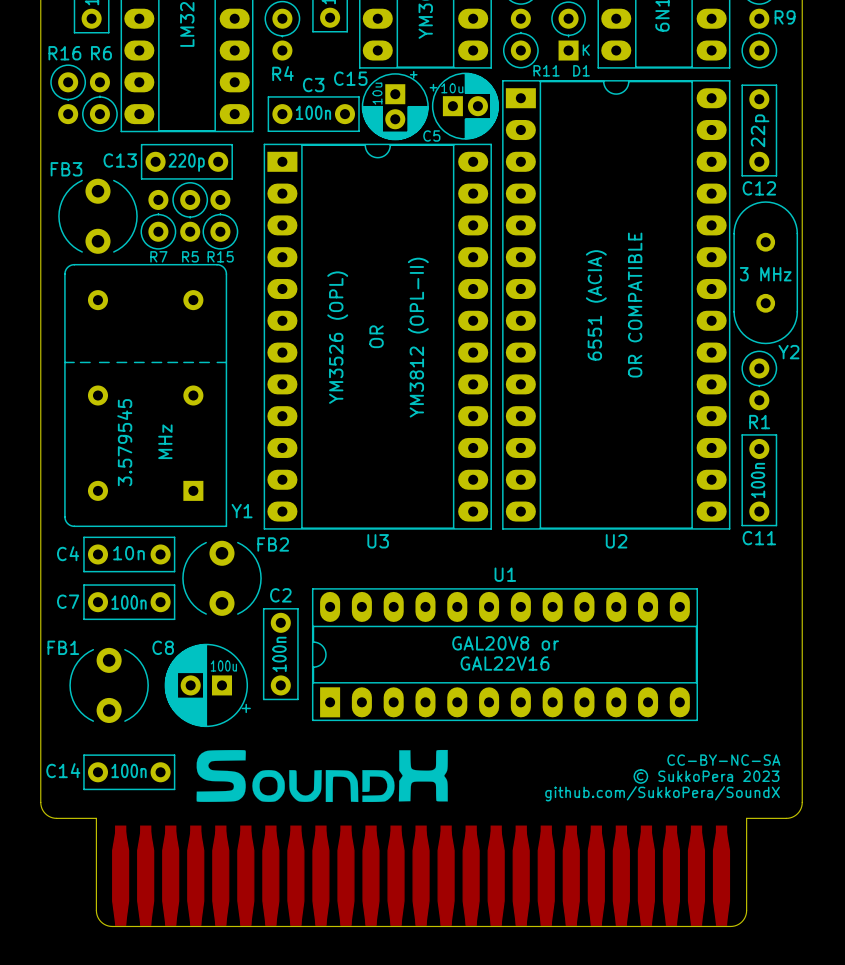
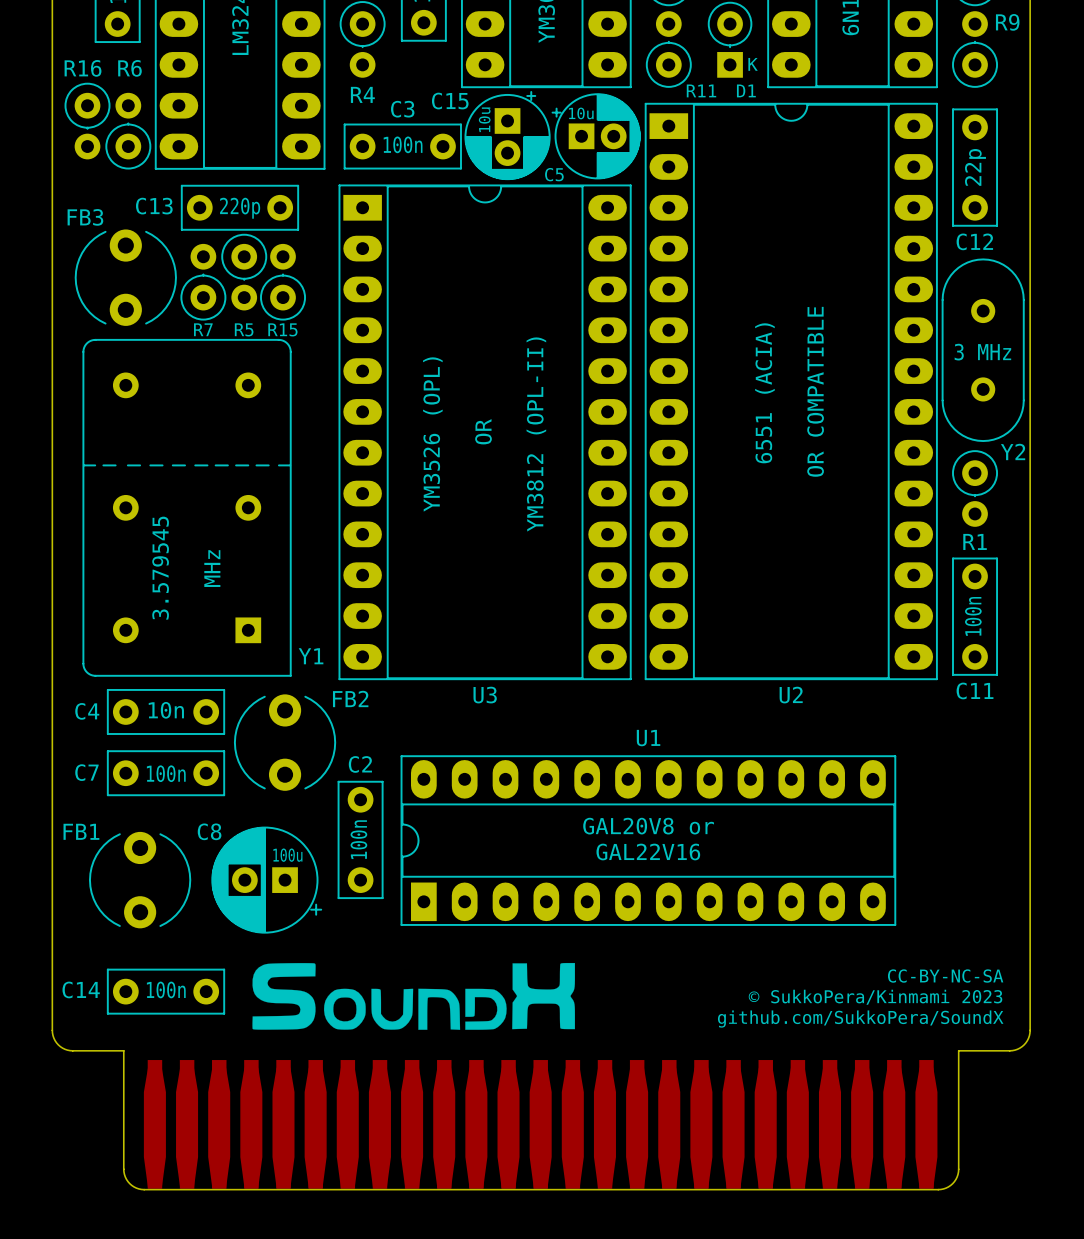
text: © SukkoPera 2023 (706, 776) -> © SukkoPera/Kinmami 2023 (875, 997)

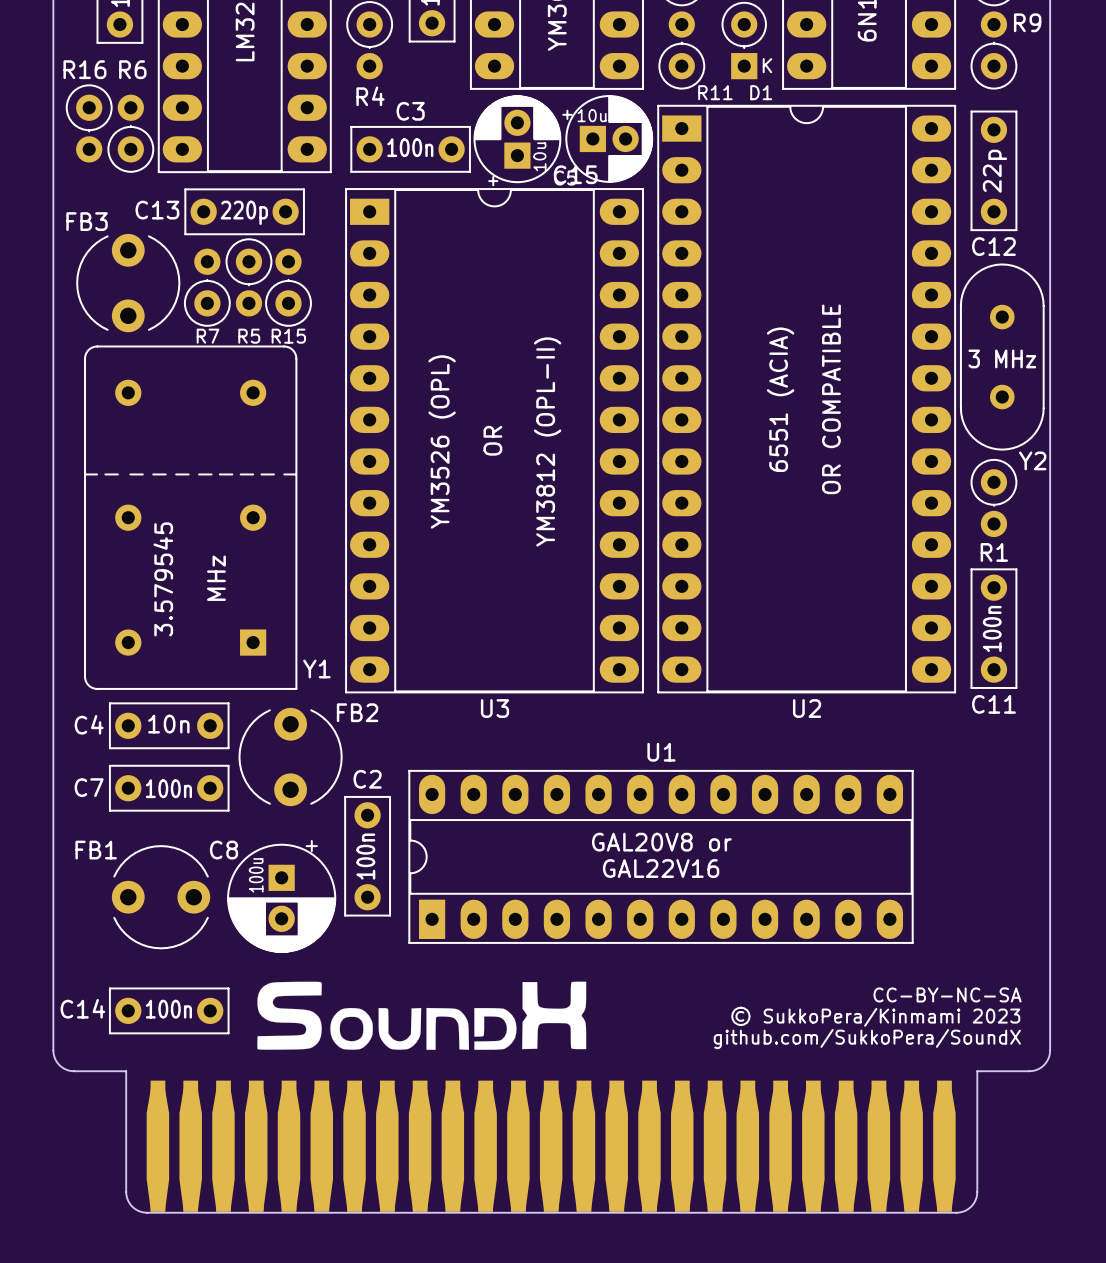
C15 rotation: 0° (507, 135) -> 180° (517, 140)
FB1 rotation: 0° (140, 880) -> 90° clockwise (161, 897)
C8 rotation: 0° (266, 880) -> 90° counterclockwise (281, 896)

